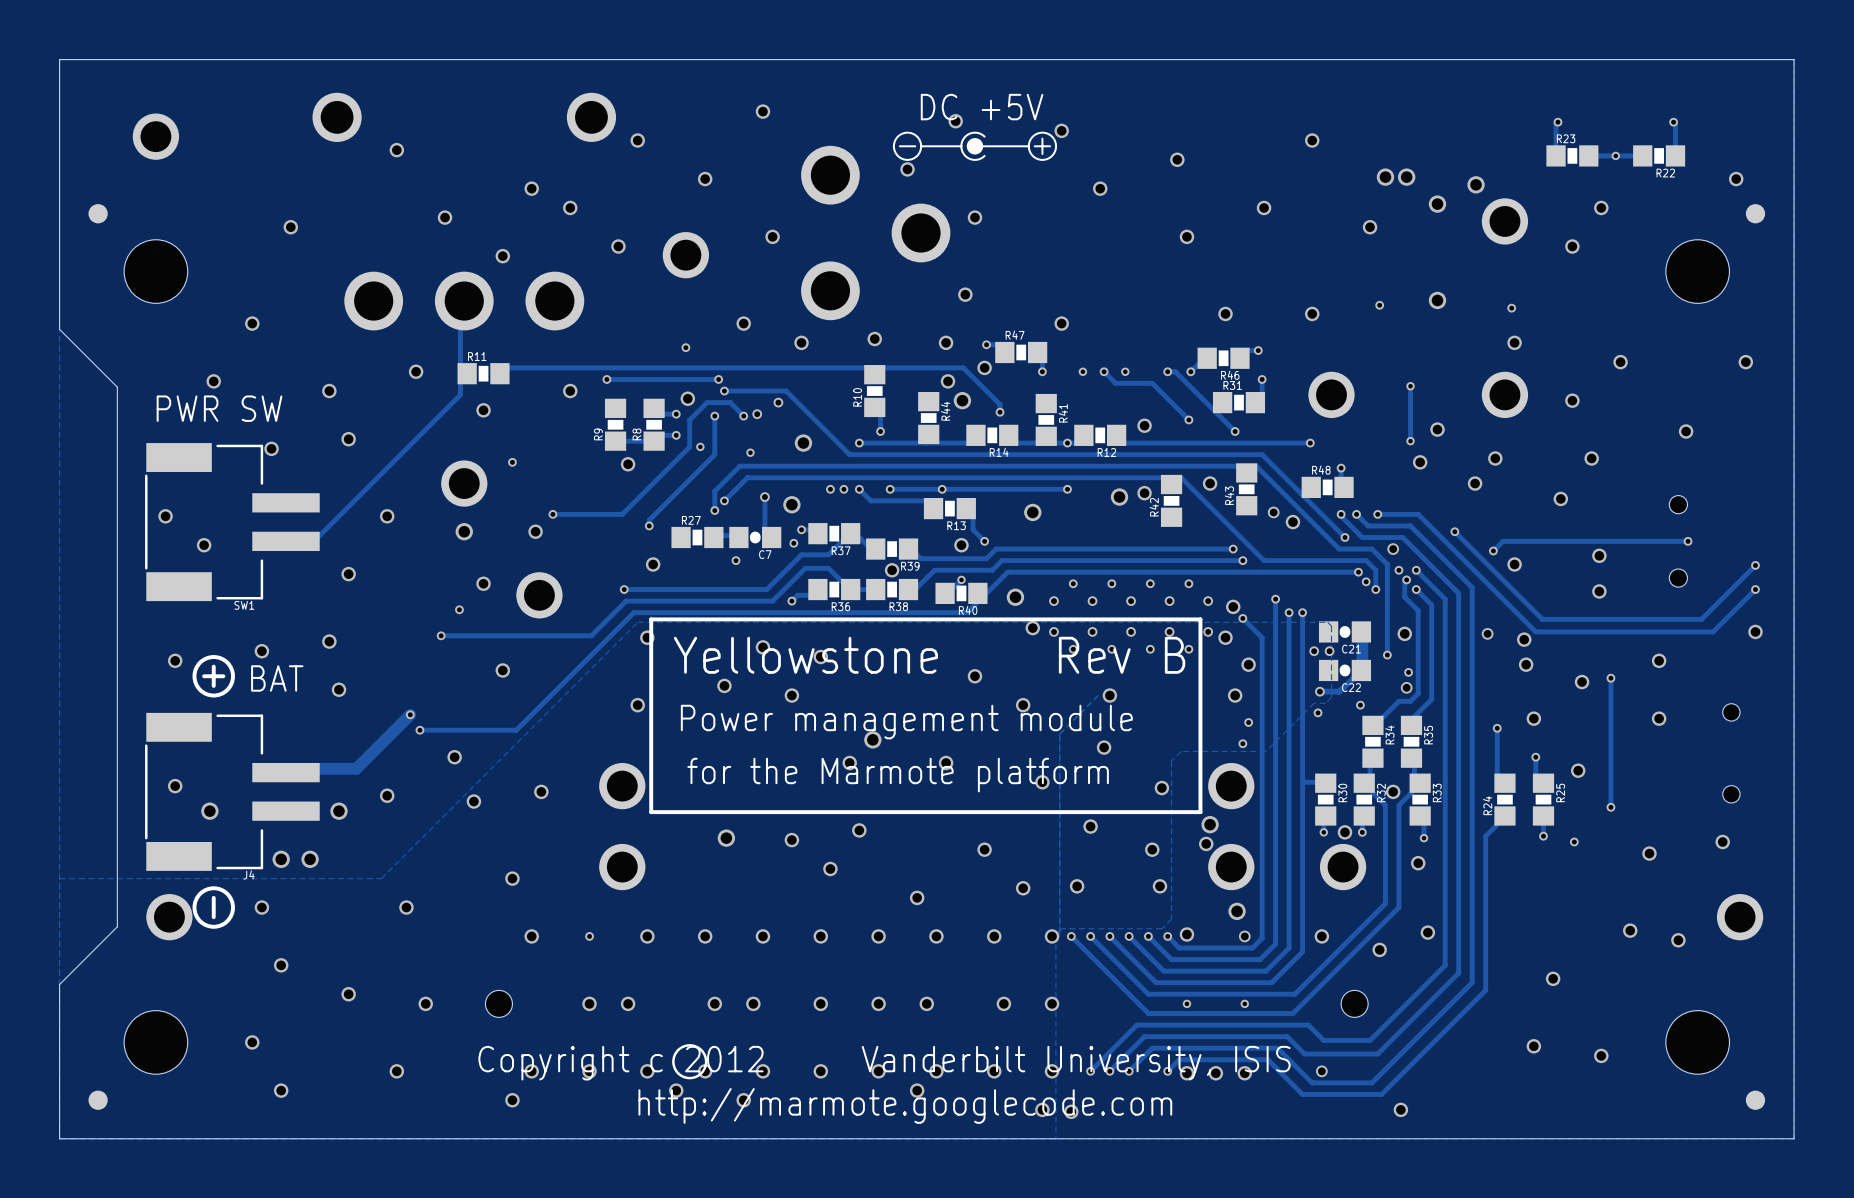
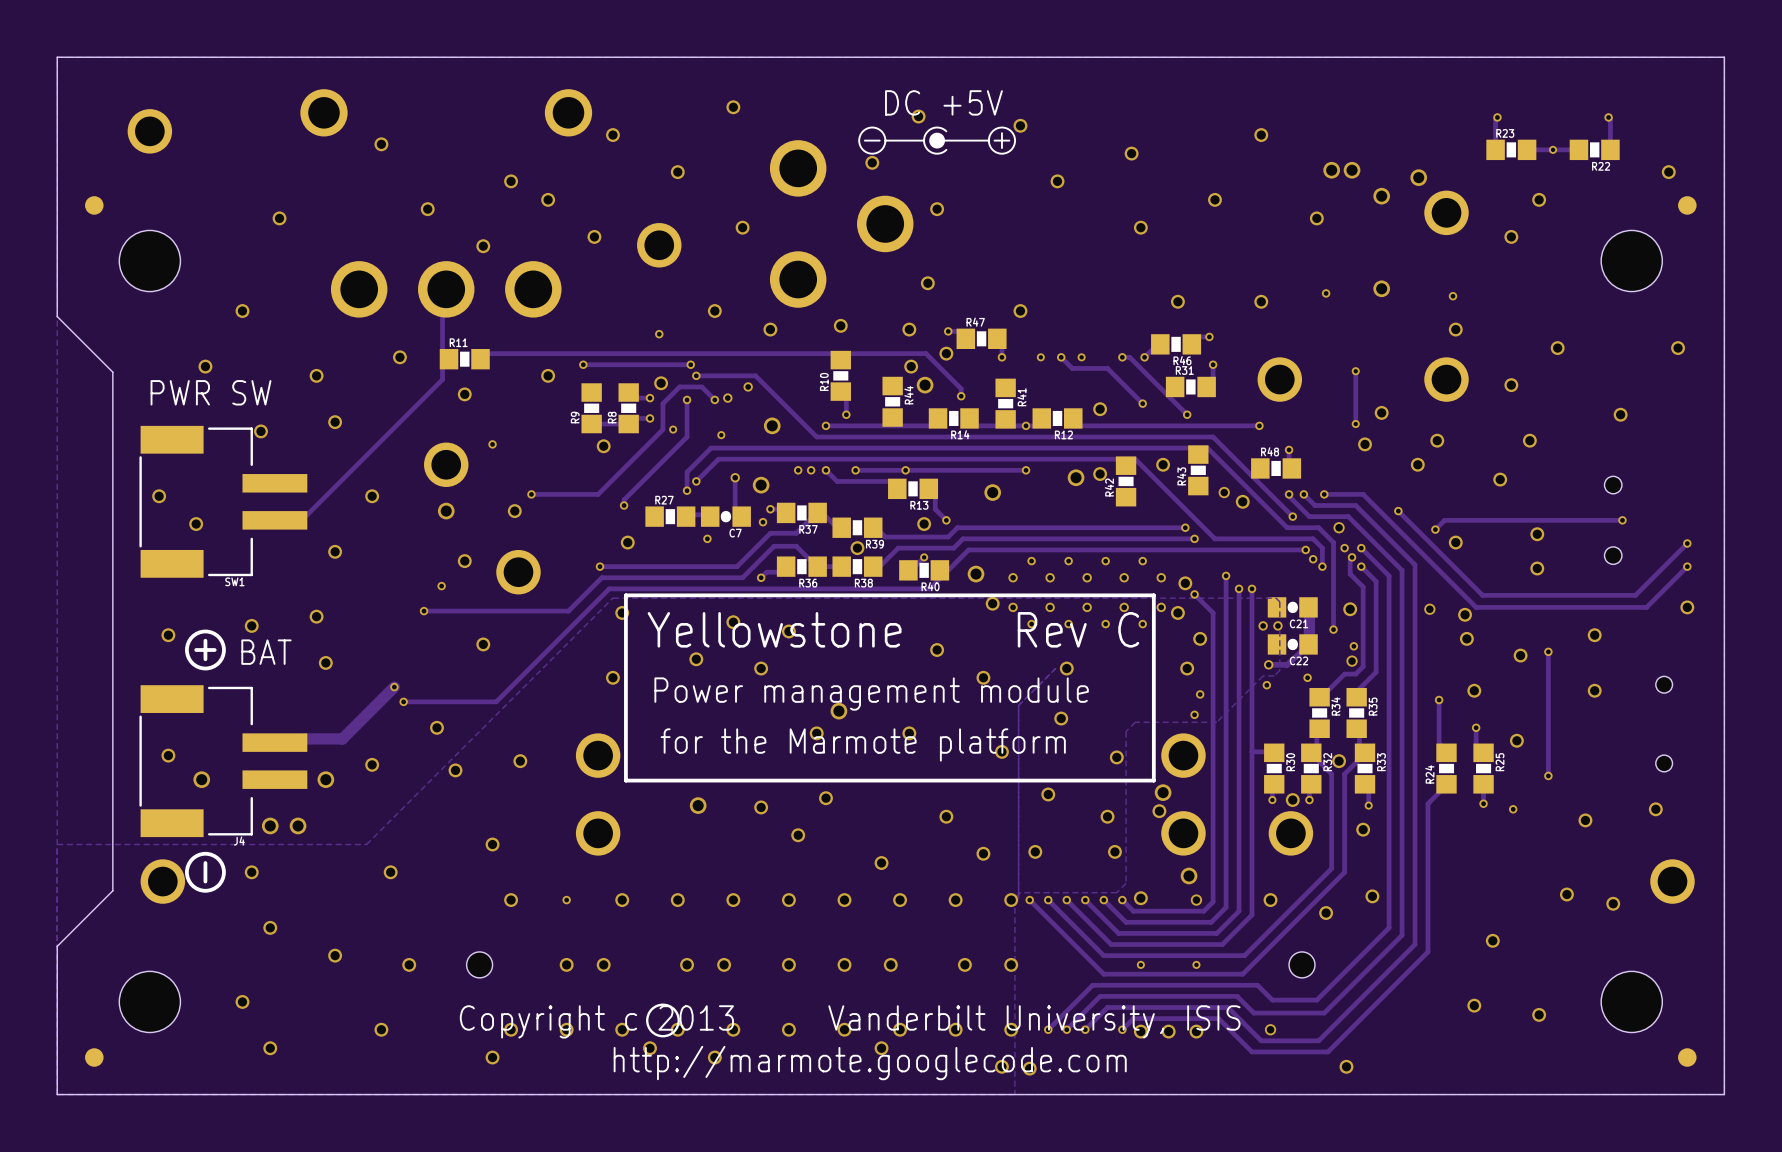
text: B (1175, 655) -> C (1128, 629)
text: Copyright c 2012 (621, 1063) -> Copyright c 2013 (596, 1021)

